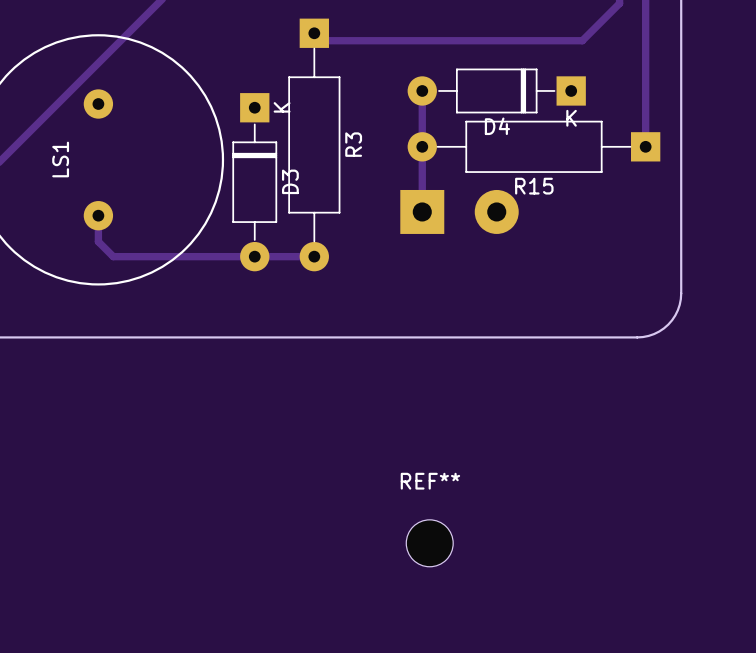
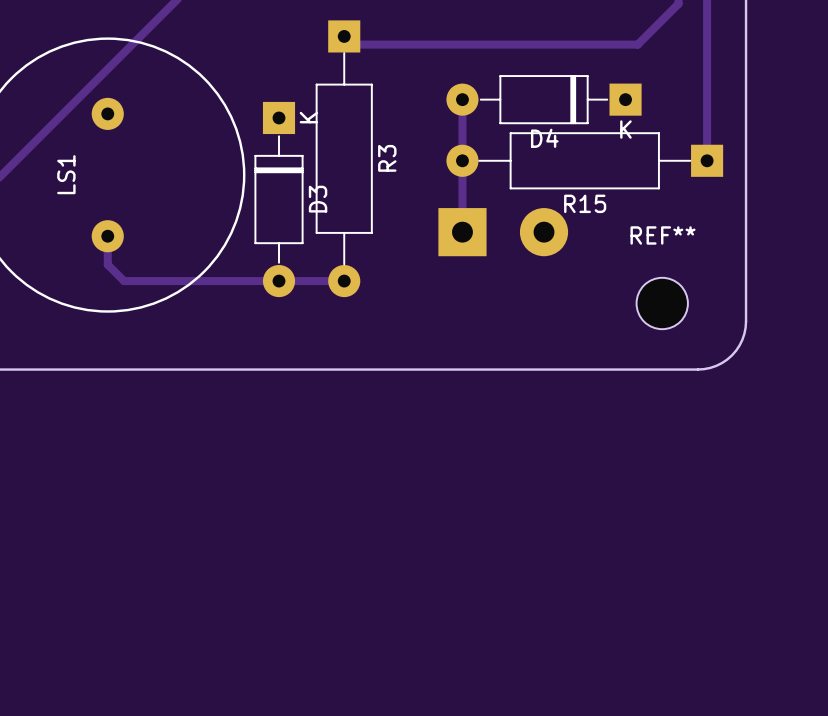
REF** position: (429, 543) -> (662, 303)

